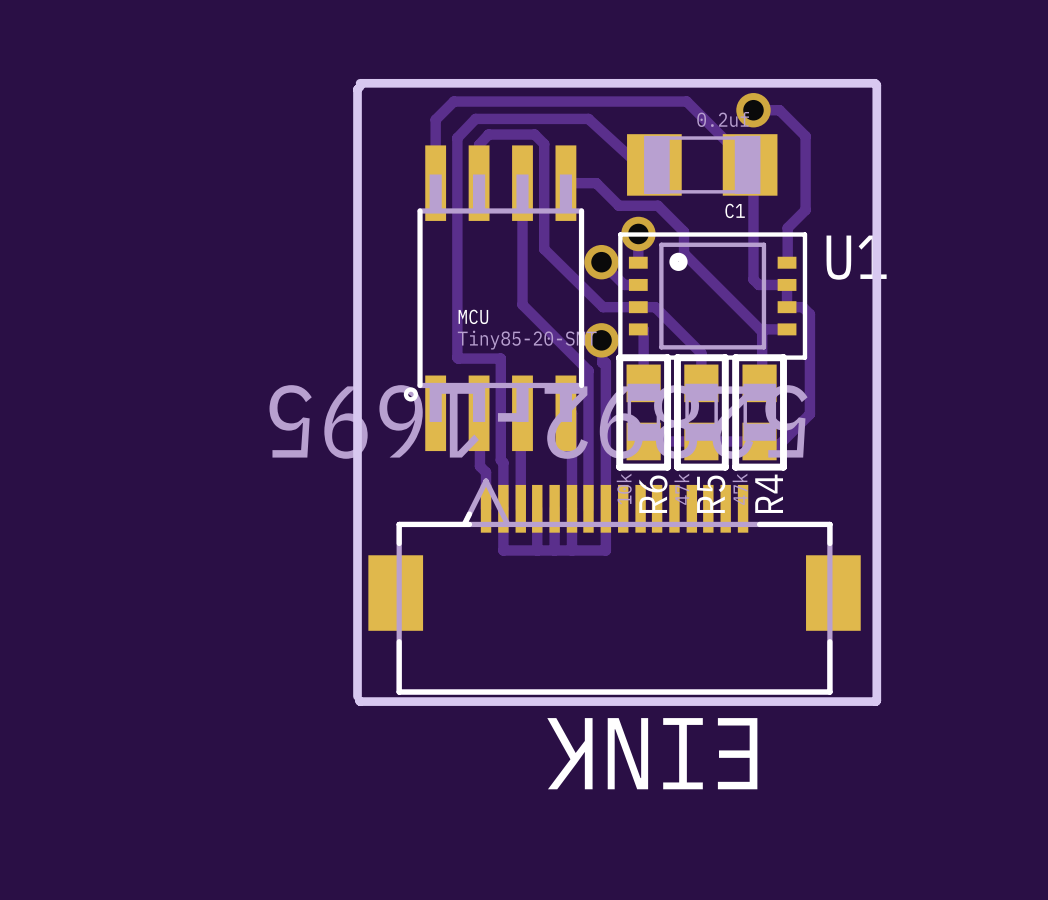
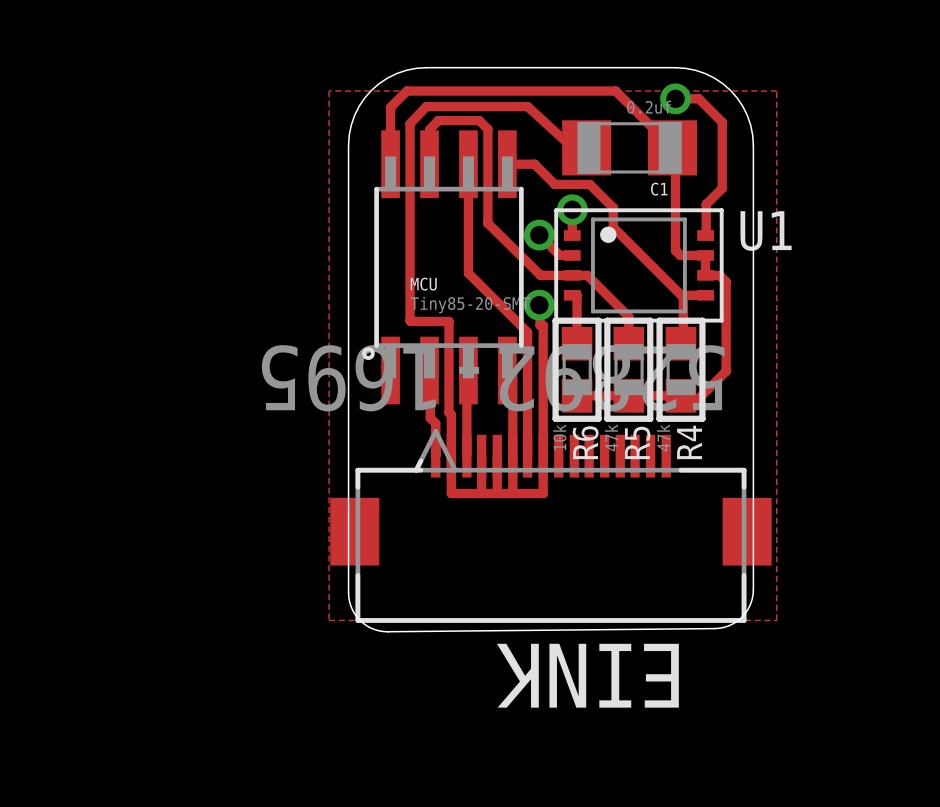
board edge: none -> (426, 67) (685, 68) (705, 73) (722, 83) (742, 106) (750, 125) (753, 145) (753, 589) (748, 609) (734, 623) (714, 628) (387, 631) (366, 625) (352, 609) (348, 592) (349, 135) (354, 115) (371, 90) (396, 73) (426, 67)
board edge: (360, 83) (875, 83) (876, 85) (876, 700) (359, 700) -> none
board edge: (360, 86) (357, 89) (357, 696) -> none
zone outline: none -> (329, 91) (776, 91) (776, 620) (329, 620) (329, 91)

